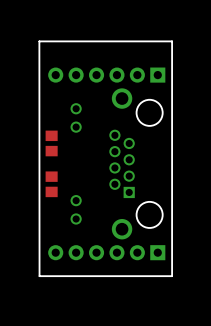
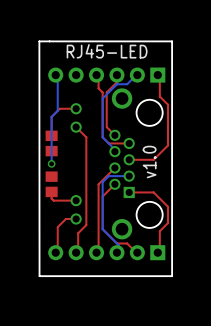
text: none -> RJ45-LED (107, 51)
bottom track: none -> (57, 72) (57, 110) (51, 116) (51, 163)
top track: none -> (98, 72) (98, 88) (102, 92) (102, 137) (108, 143) (129, 143)
top track: none -> (119, 72) (119, 80) (106, 92) (106, 127) (114, 135)
bottom track: none -> (139, 72) (127, 84) (116, 84) (102, 98) (102, 137) (114, 151)
top track: none -> (159, 72) (159, 96) (167, 104) (167, 145) (153, 159) (129, 159)
top track: none -> (76, 108) (59, 108) (51, 116) (51, 135)
top track: none -> (76, 127) (86, 137) (86, 225) (78, 233) (78, 255)
text: none -> v1.0 (149, 162)
via: none -> (51, 163)
top track: none -> (114, 167) (98, 184) (98, 255)
bottom track: none -> (129, 176) (108, 176) (102, 182) (102, 229) (119, 245) (119, 255)
top track: none -> (114, 184) (102, 196) (102, 229) (116, 243) (127, 243) (139, 255)
top track: none -> (51, 191) (51, 198) (53, 200) (76, 200)
top track: none -> (129, 192) (153, 192) (167, 206) (167, 223) (159, 231) (159, 255)
top track: none -> (76, 219) (65, 219) (57, 227) (57, 255)

